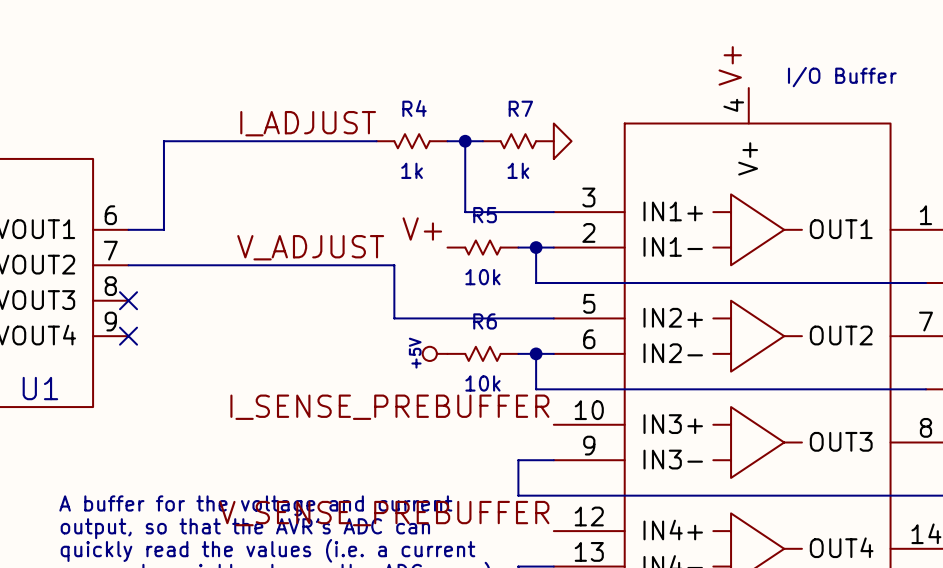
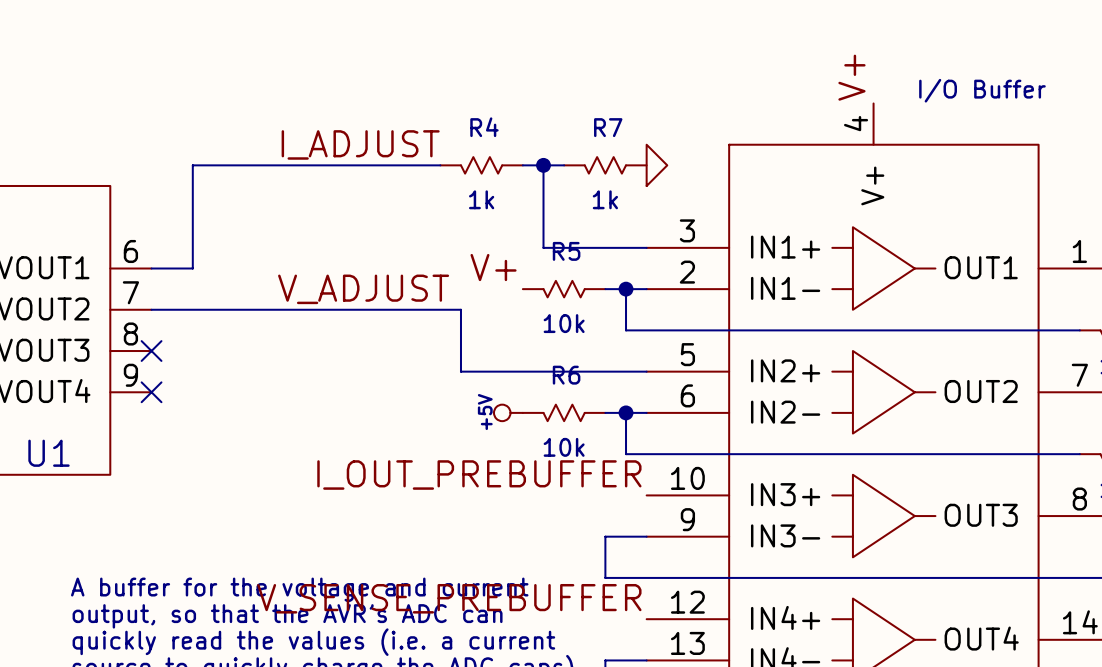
label: I_SENSE_PREBUFFER (389, 407) -> I_OUT_PREBUFFER (479, 475)

